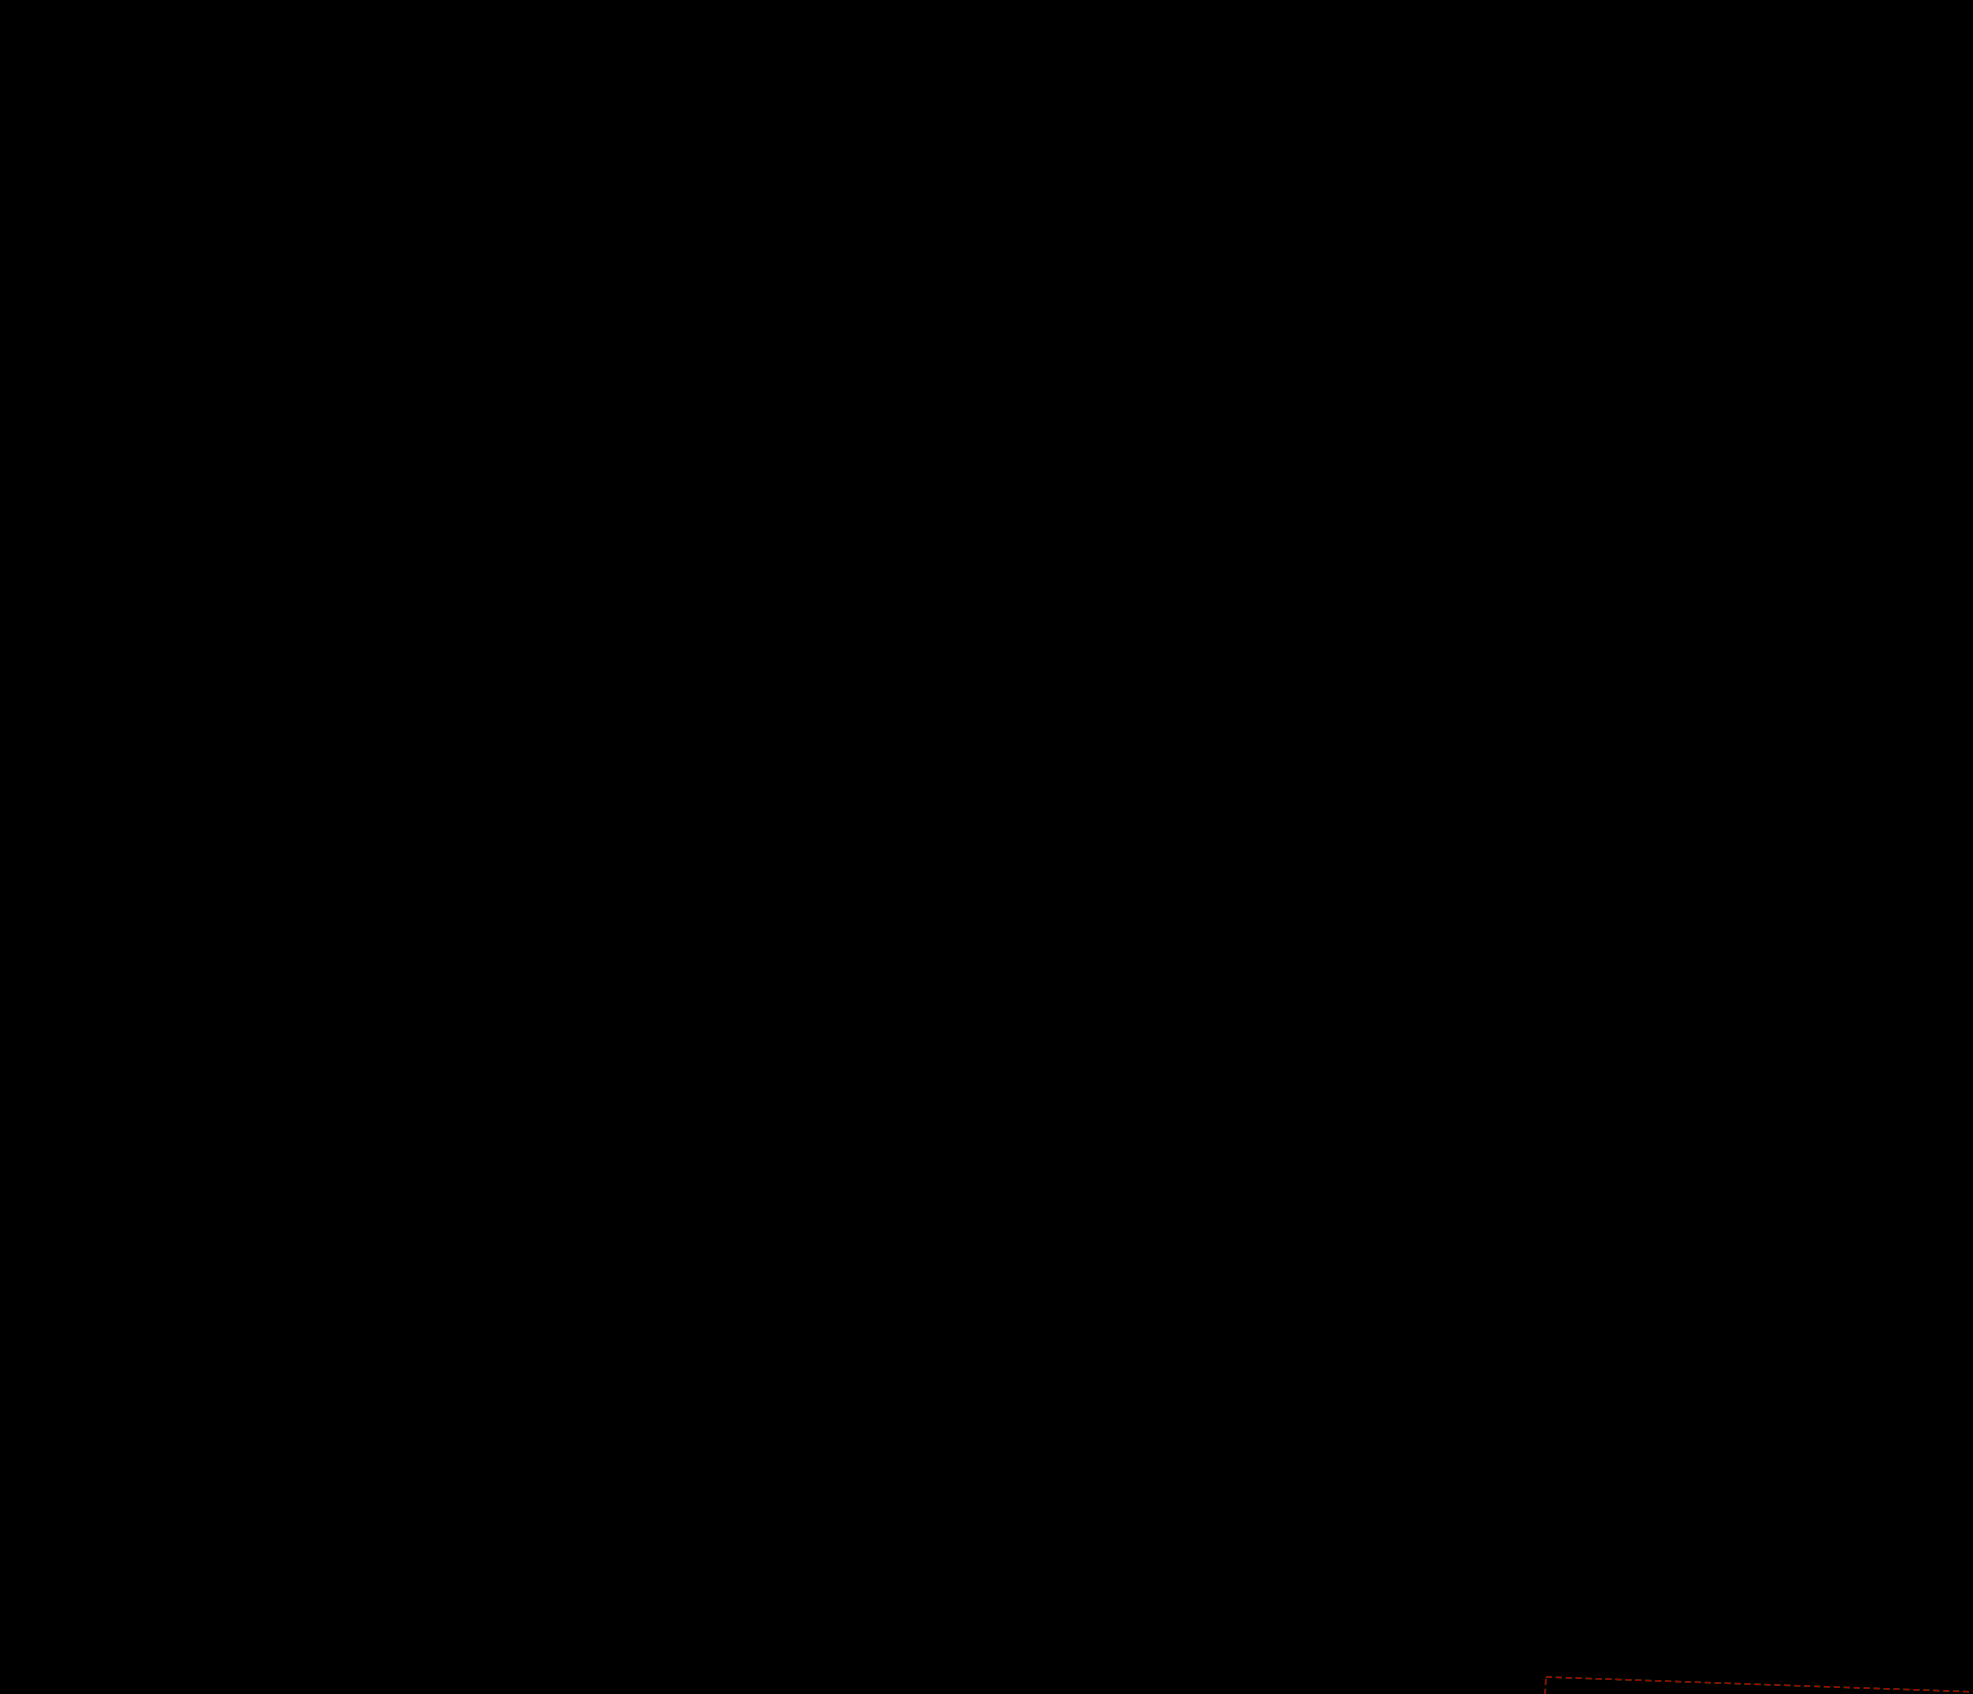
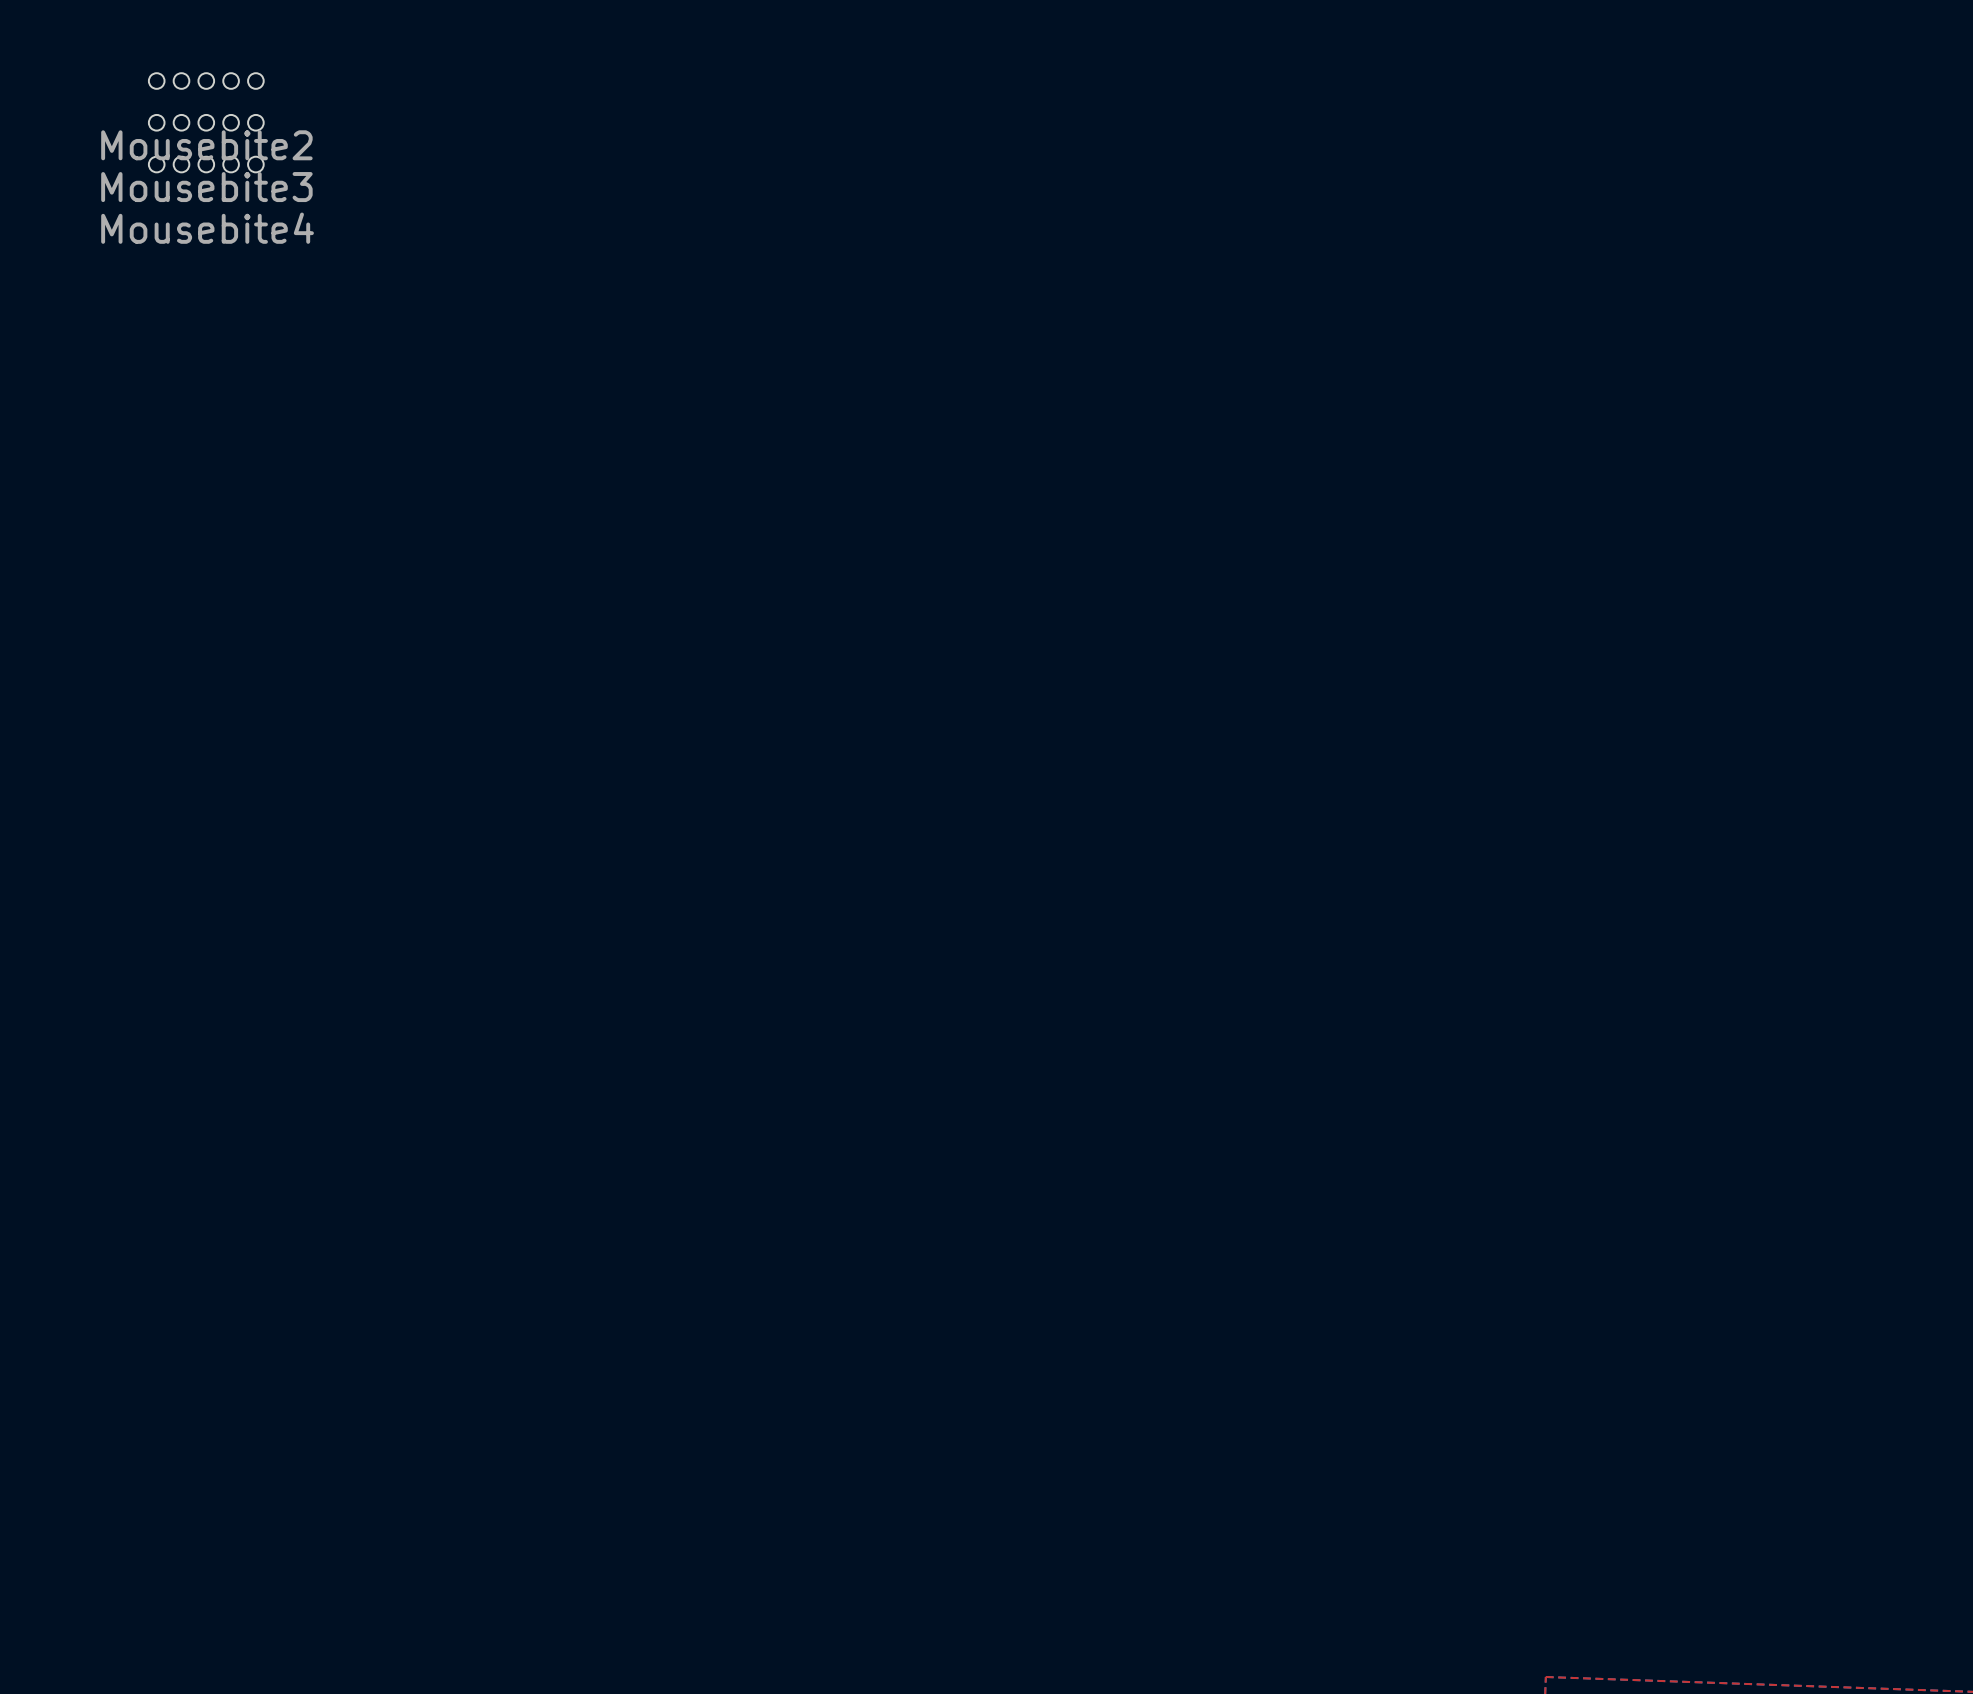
Mousebite2: none -> (206, 81)
Mousebite3: none -> (206, 122)
Mousebite4: none -> (206, 164)

